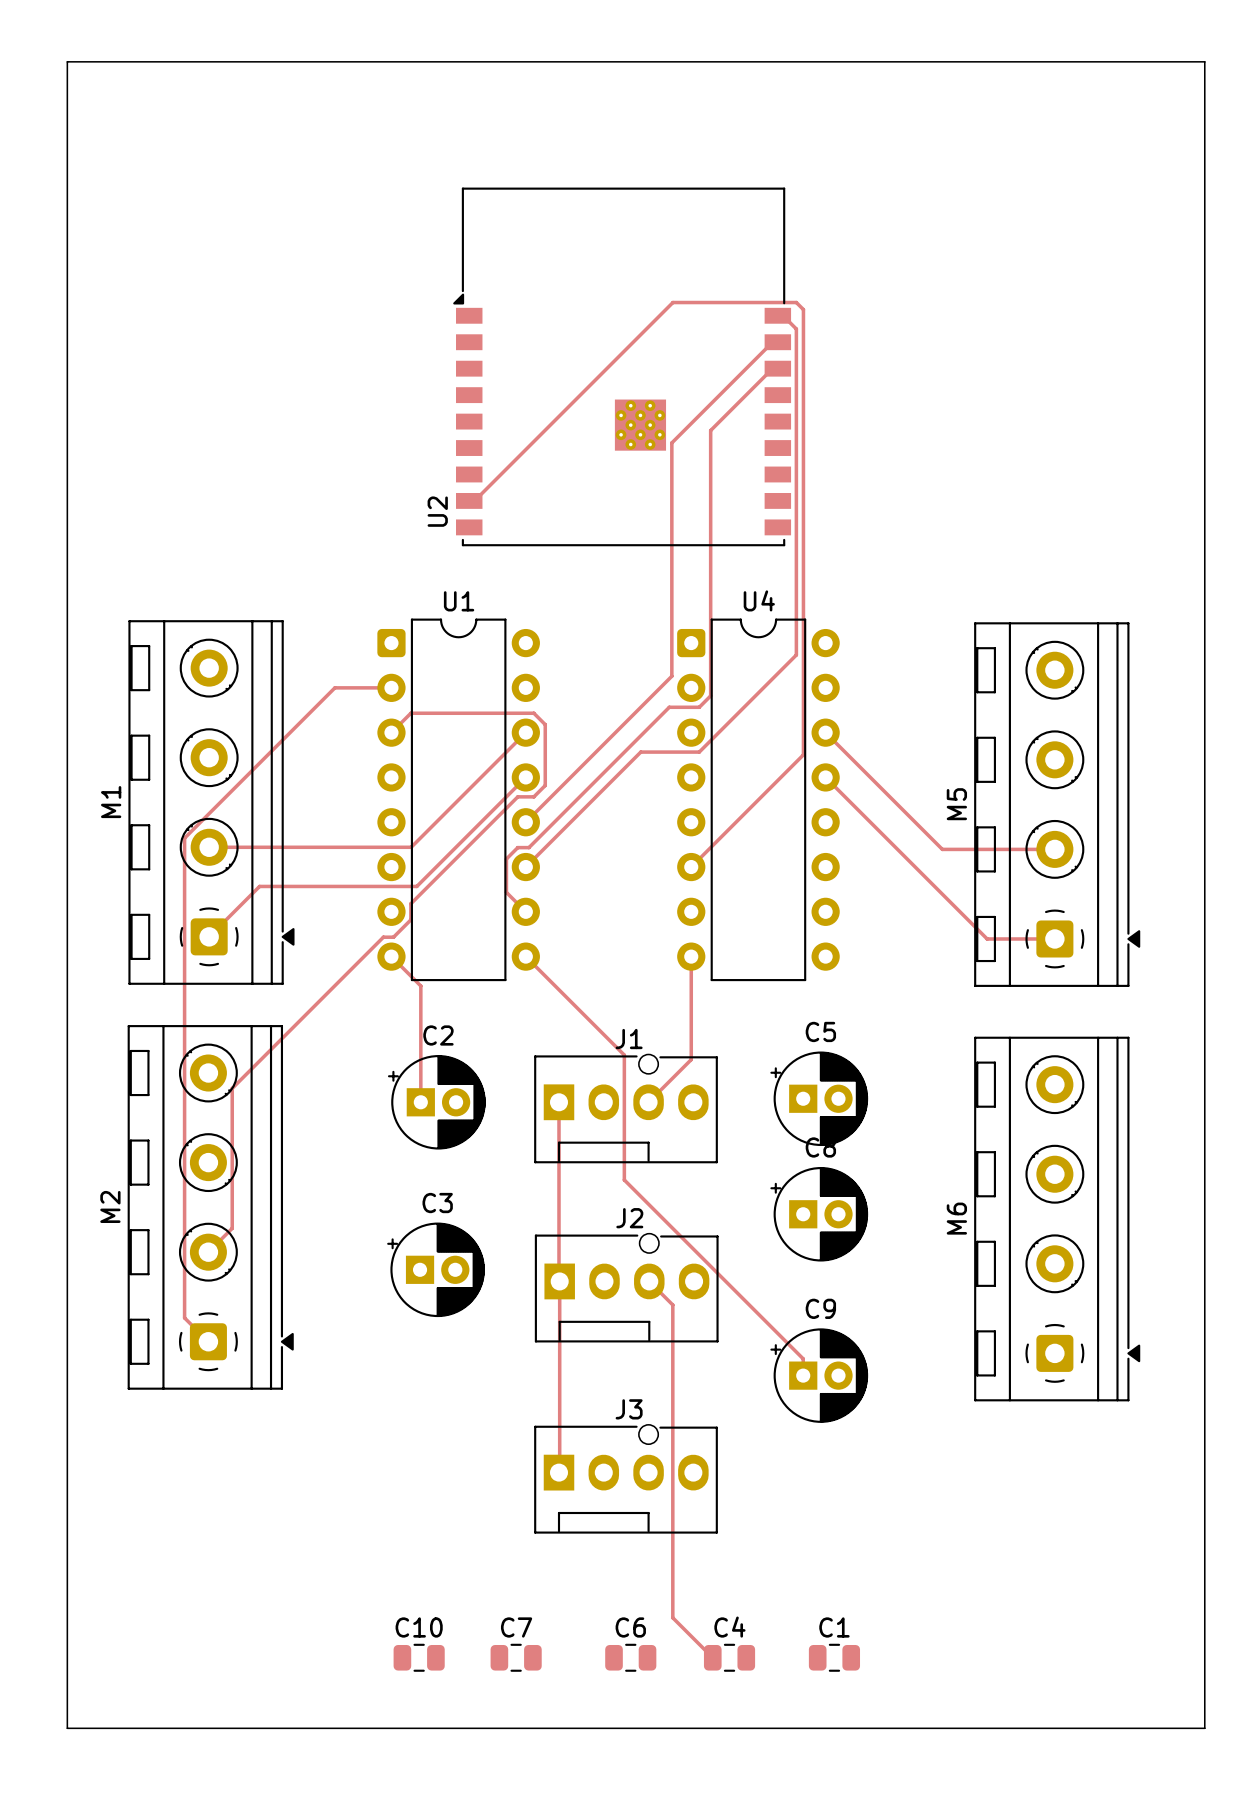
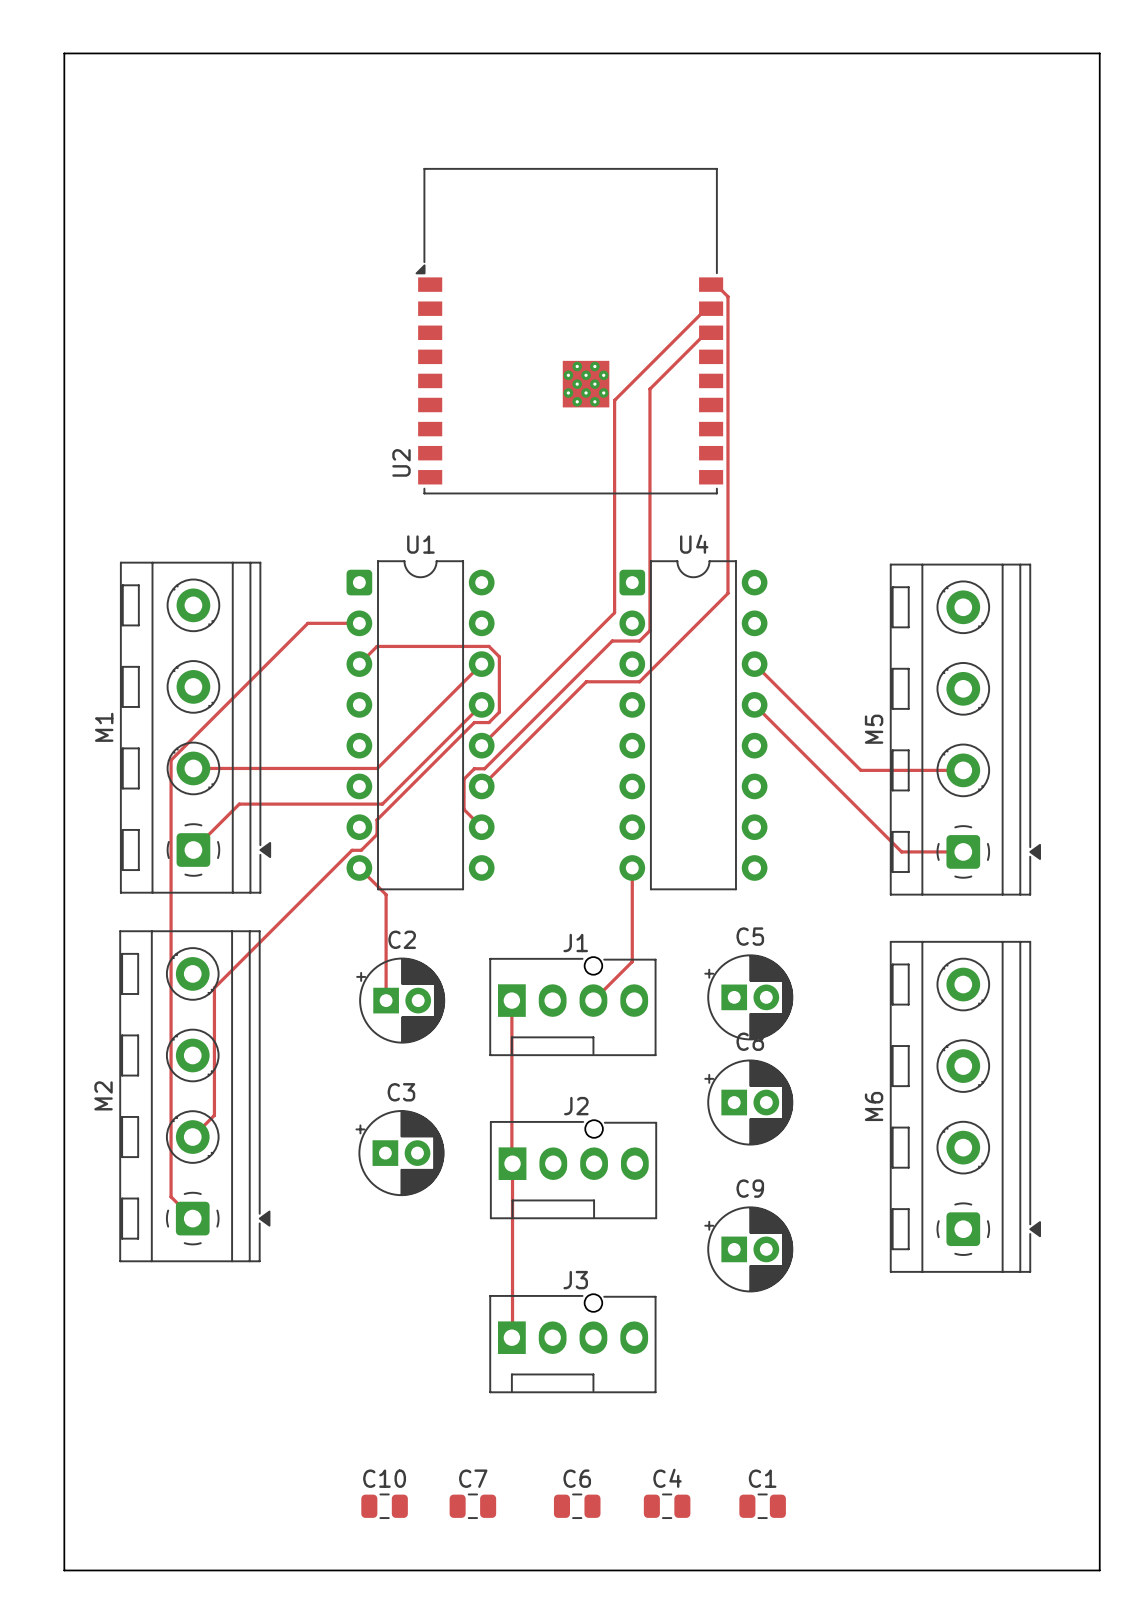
track: (469, 500) (474, 500) (672, 302) (796, 302) (803, 309) (803, 754) (691, 867) -> none
track: (525, 956) (624, 1055) (624, 1180) (803, 1358) (803, 1375) -> none
track: (649, 1281) (672, 1304) (672, 1617) (712, 1657) -> none

